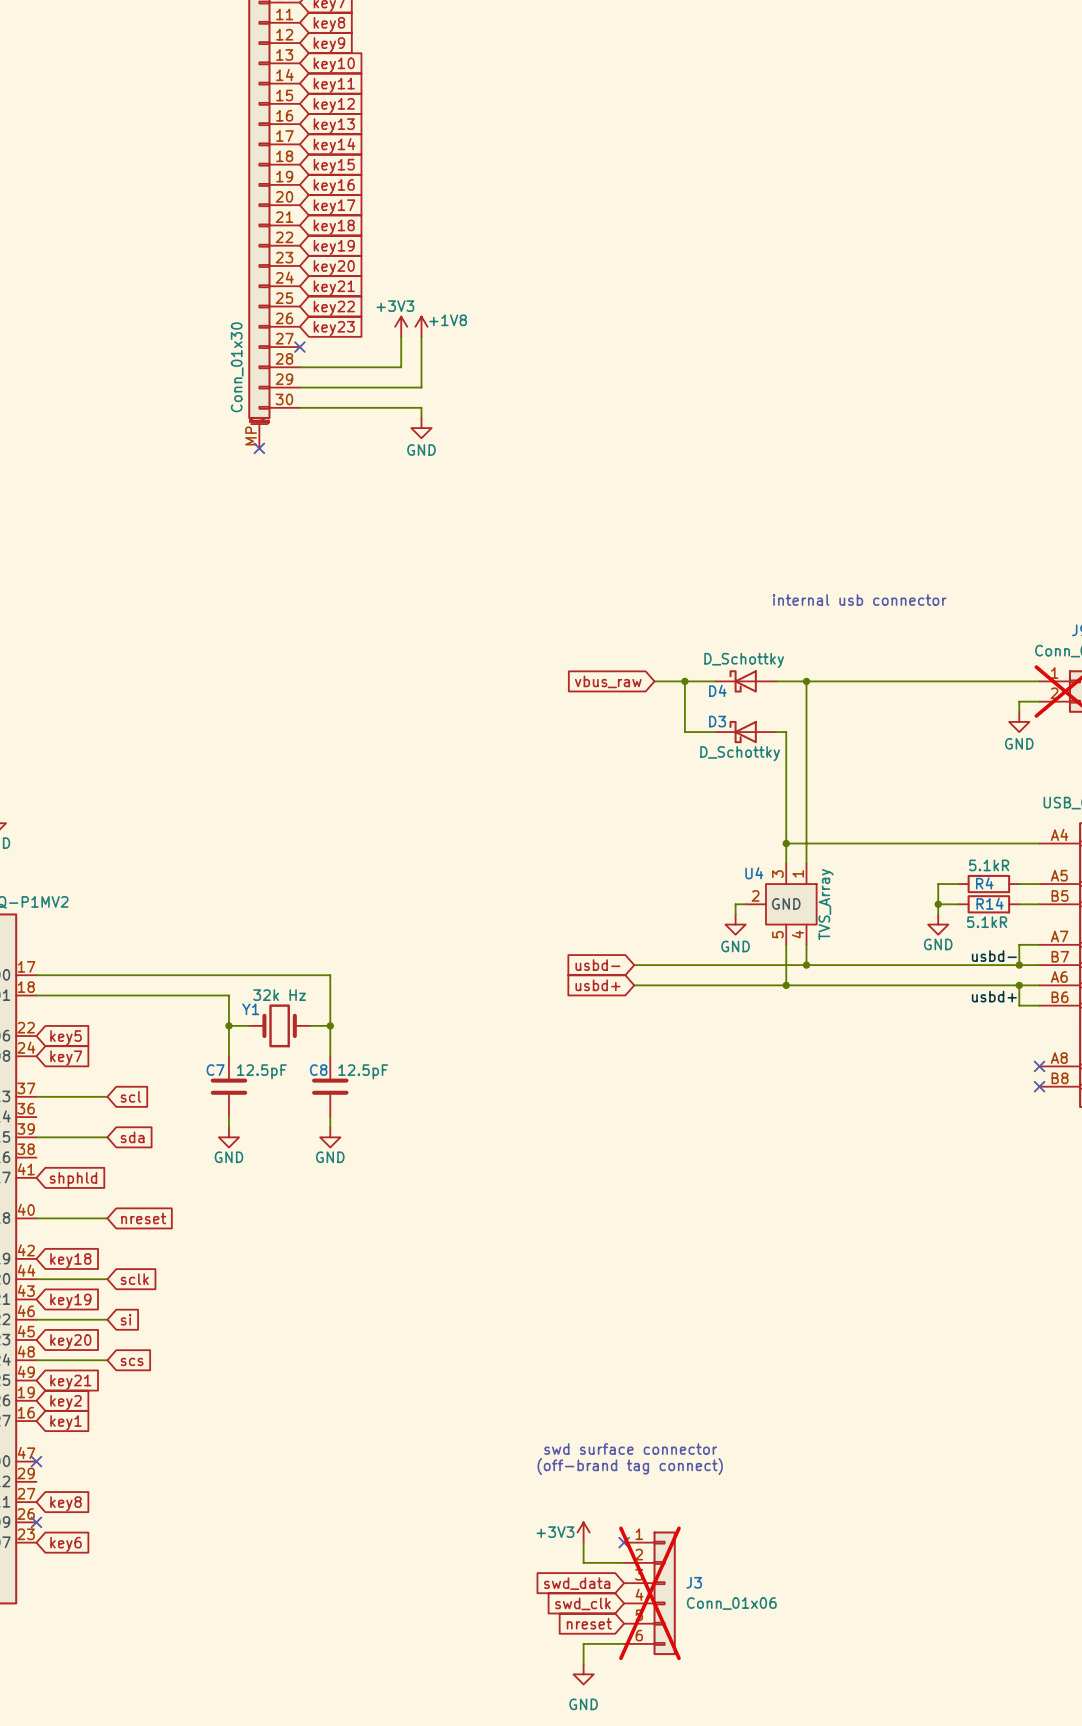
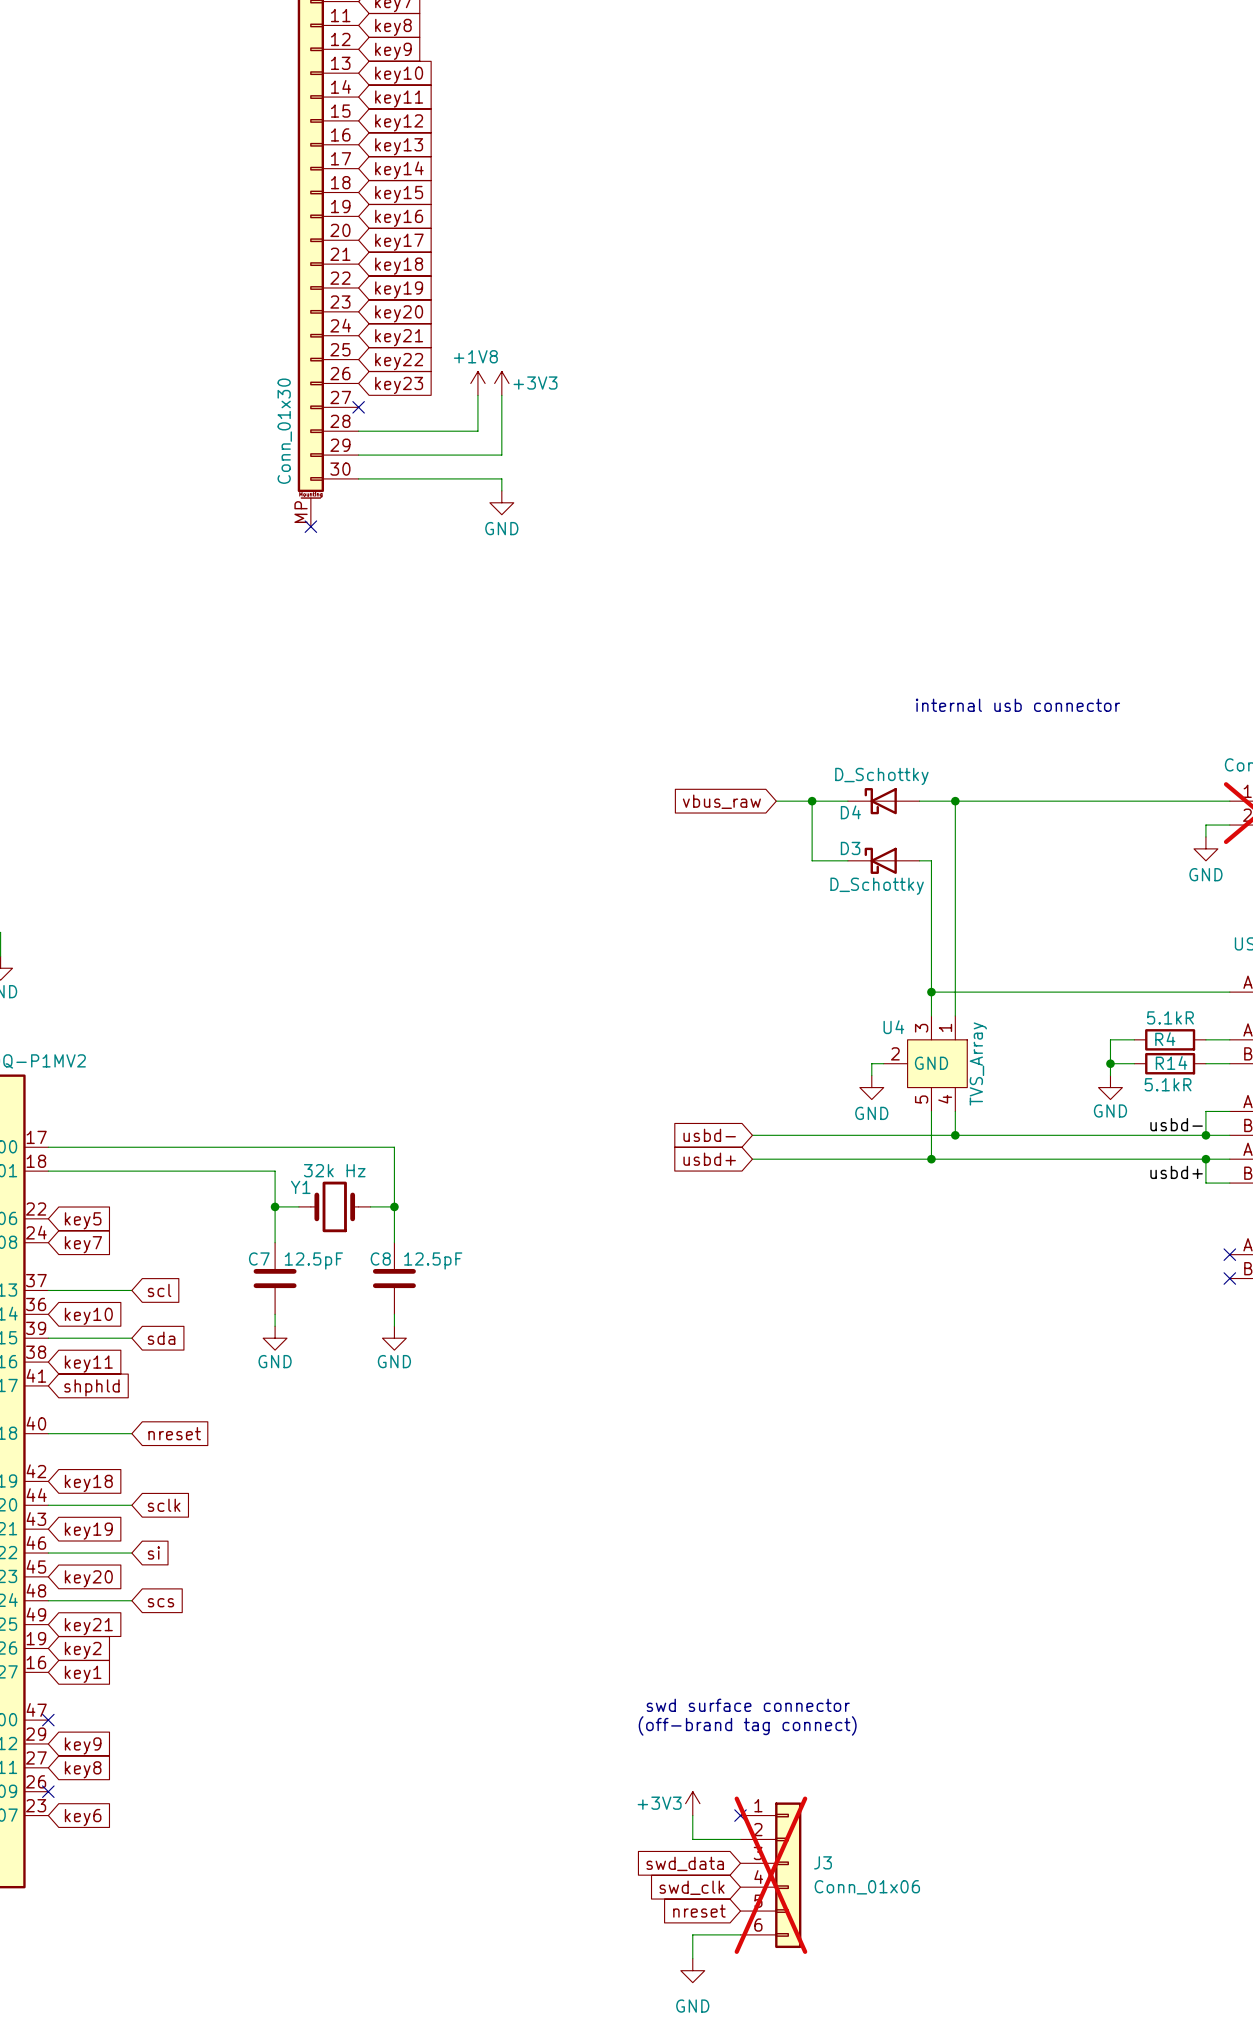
power symbol: +3V3 (401, 326) -> +1V8 (477, 383)
power symbol: +1V8 (421, 326) -> +3V3 (501, 383)
global label: none -> key10 (88, 1316)
global label: none -> key11 (88, 1364)
global label: none -> key9 (83, 1745)

